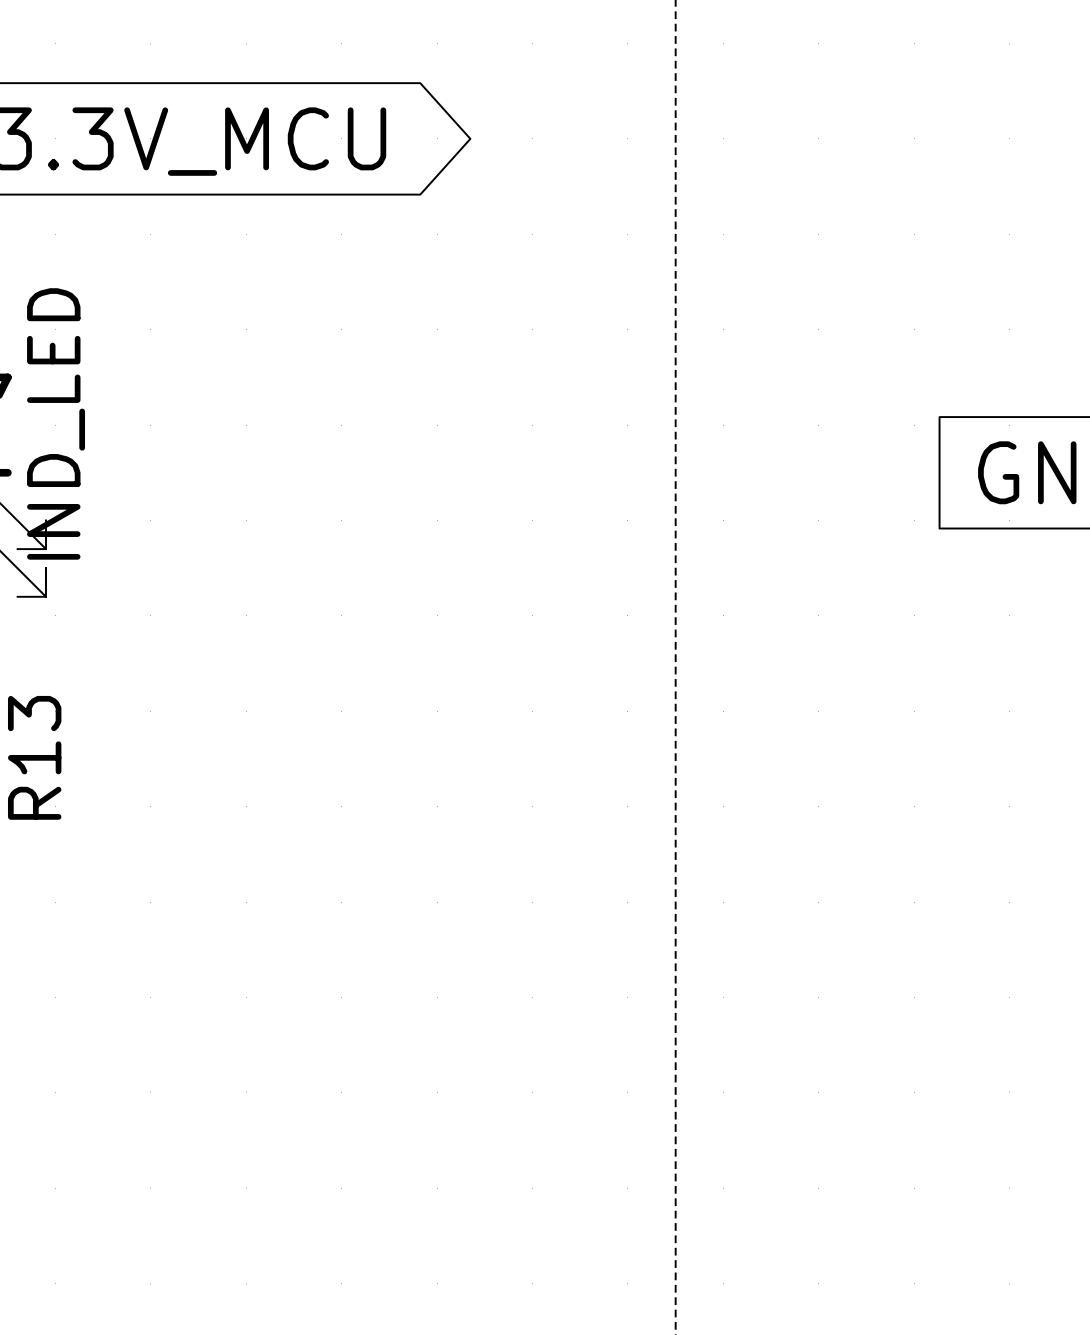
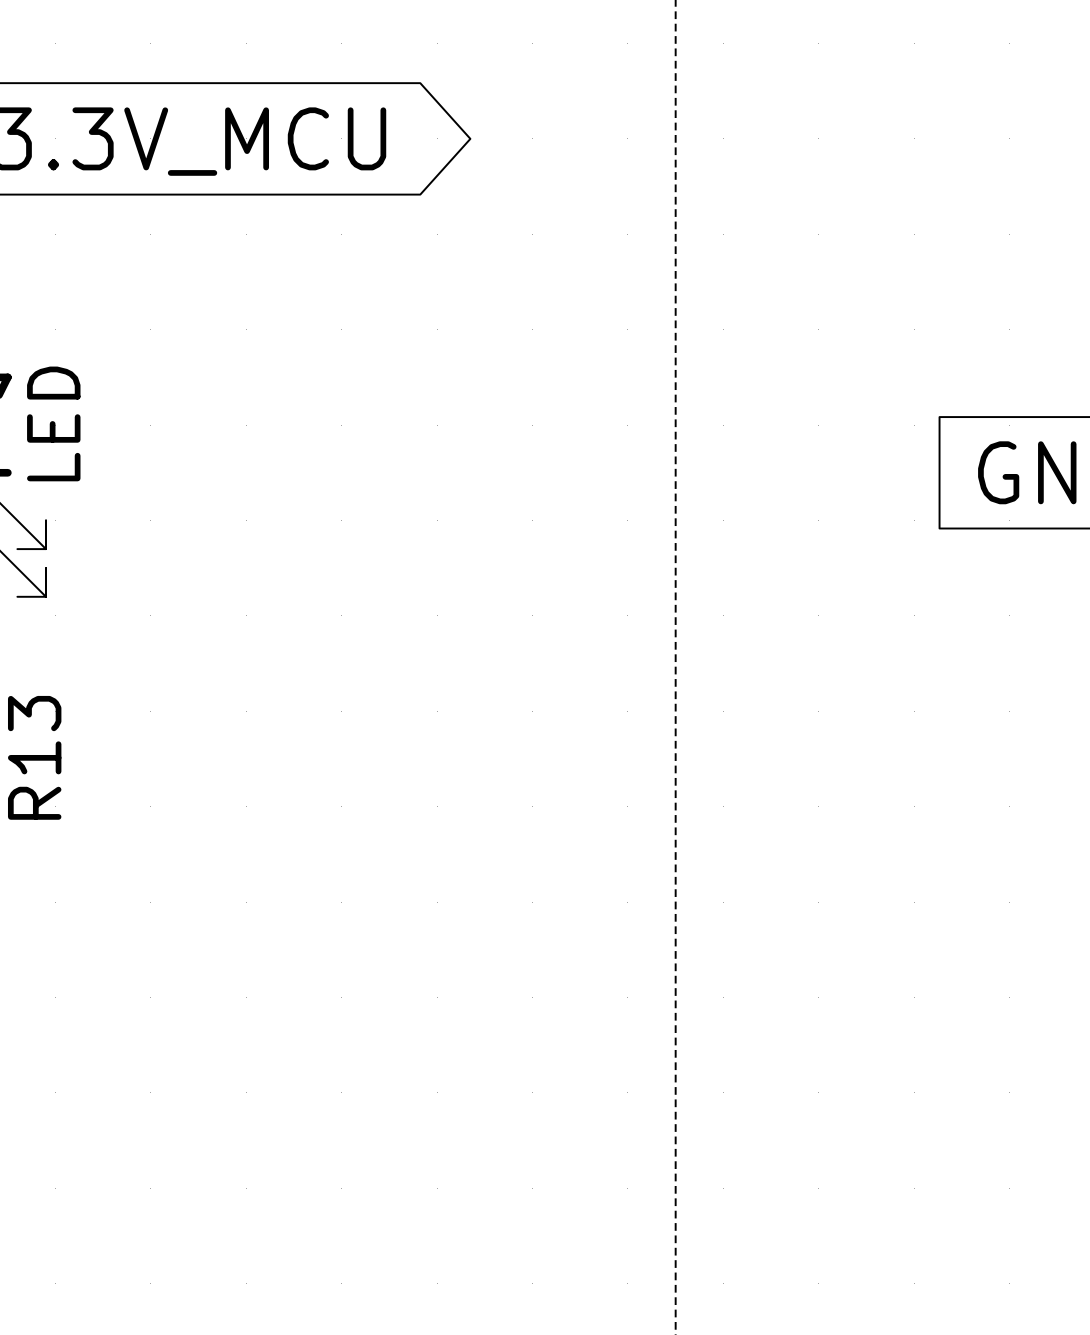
part value: IND_LED (56, 423) -> LED (53, 423)

